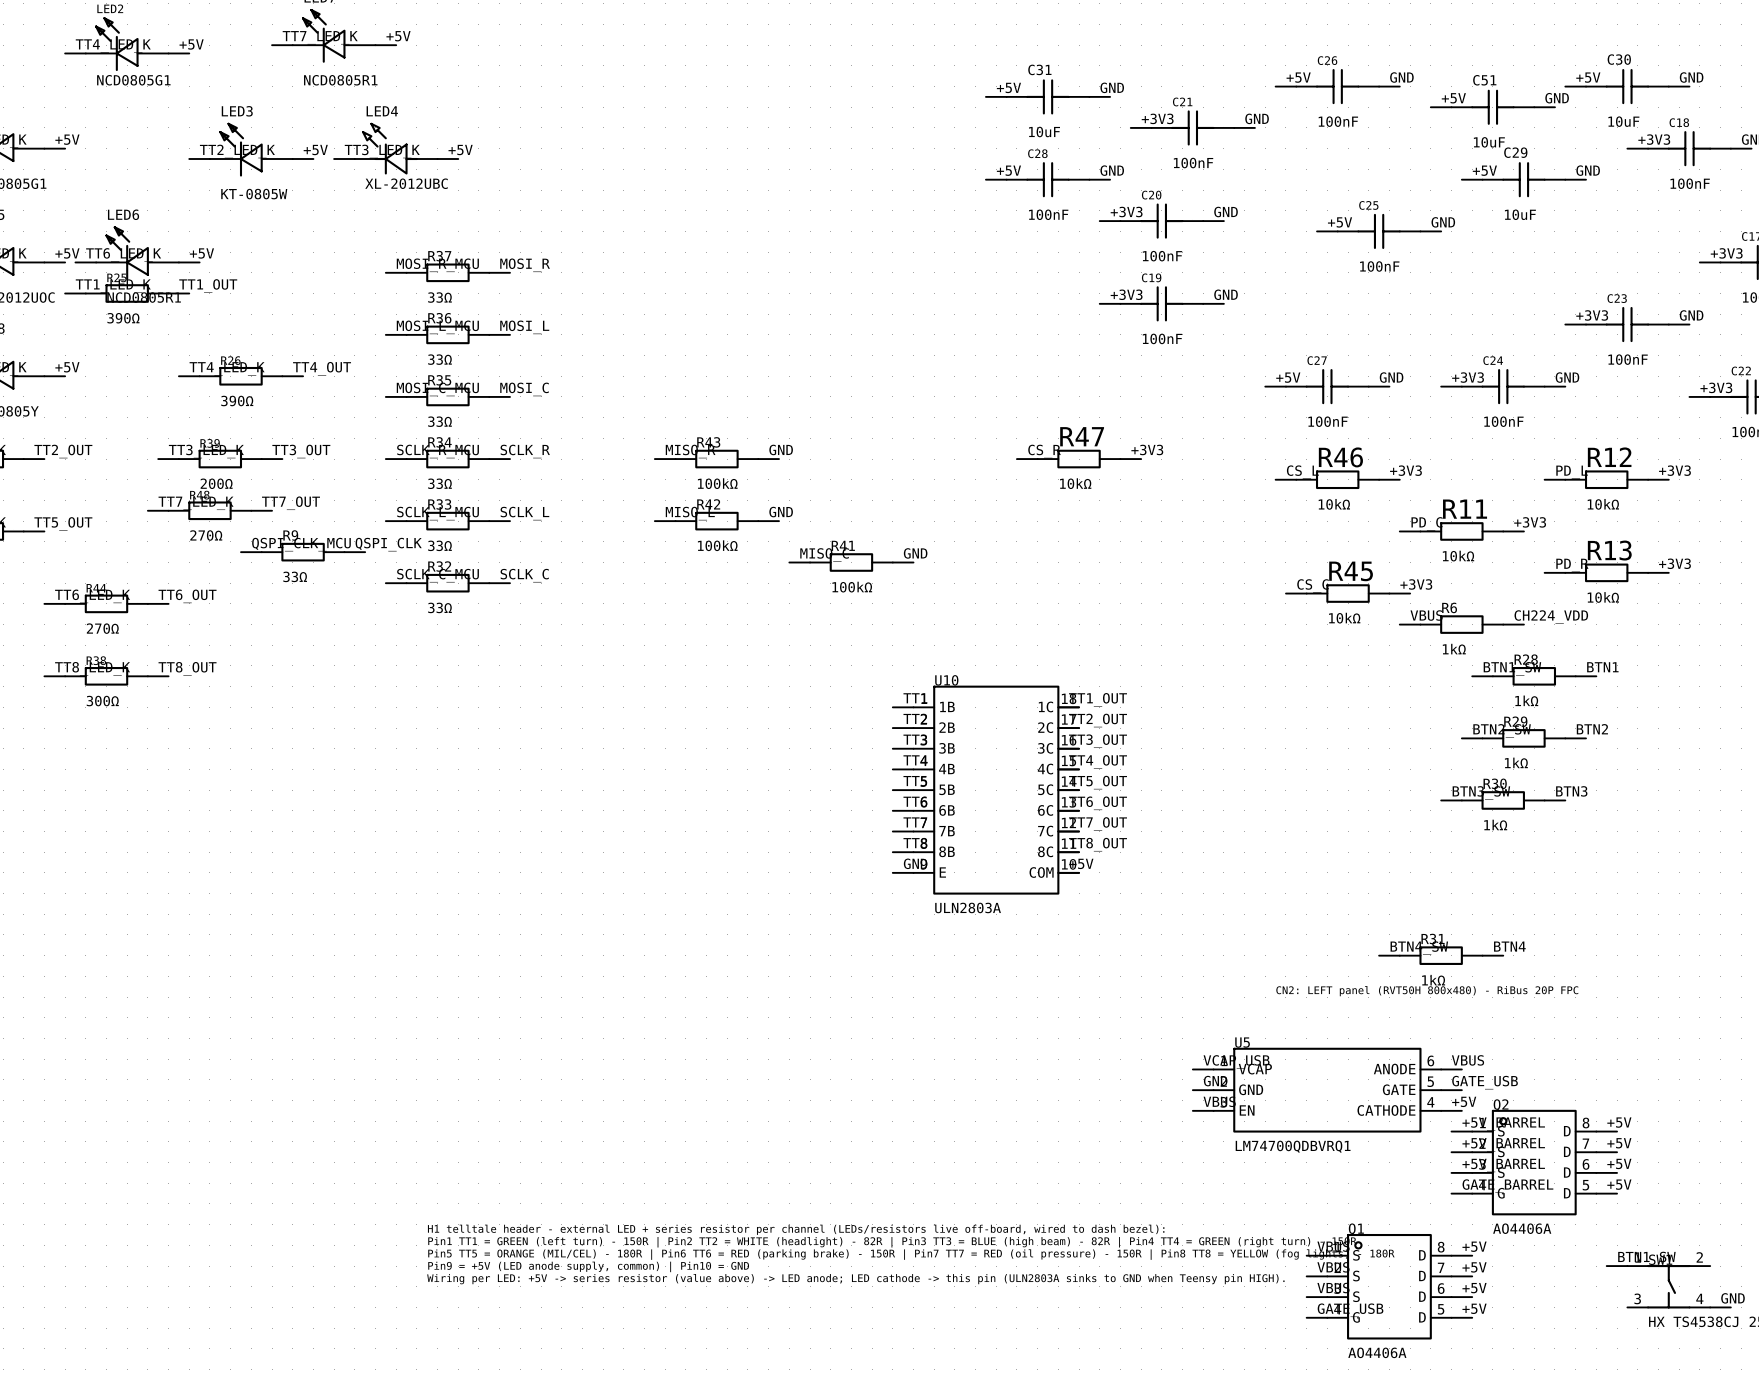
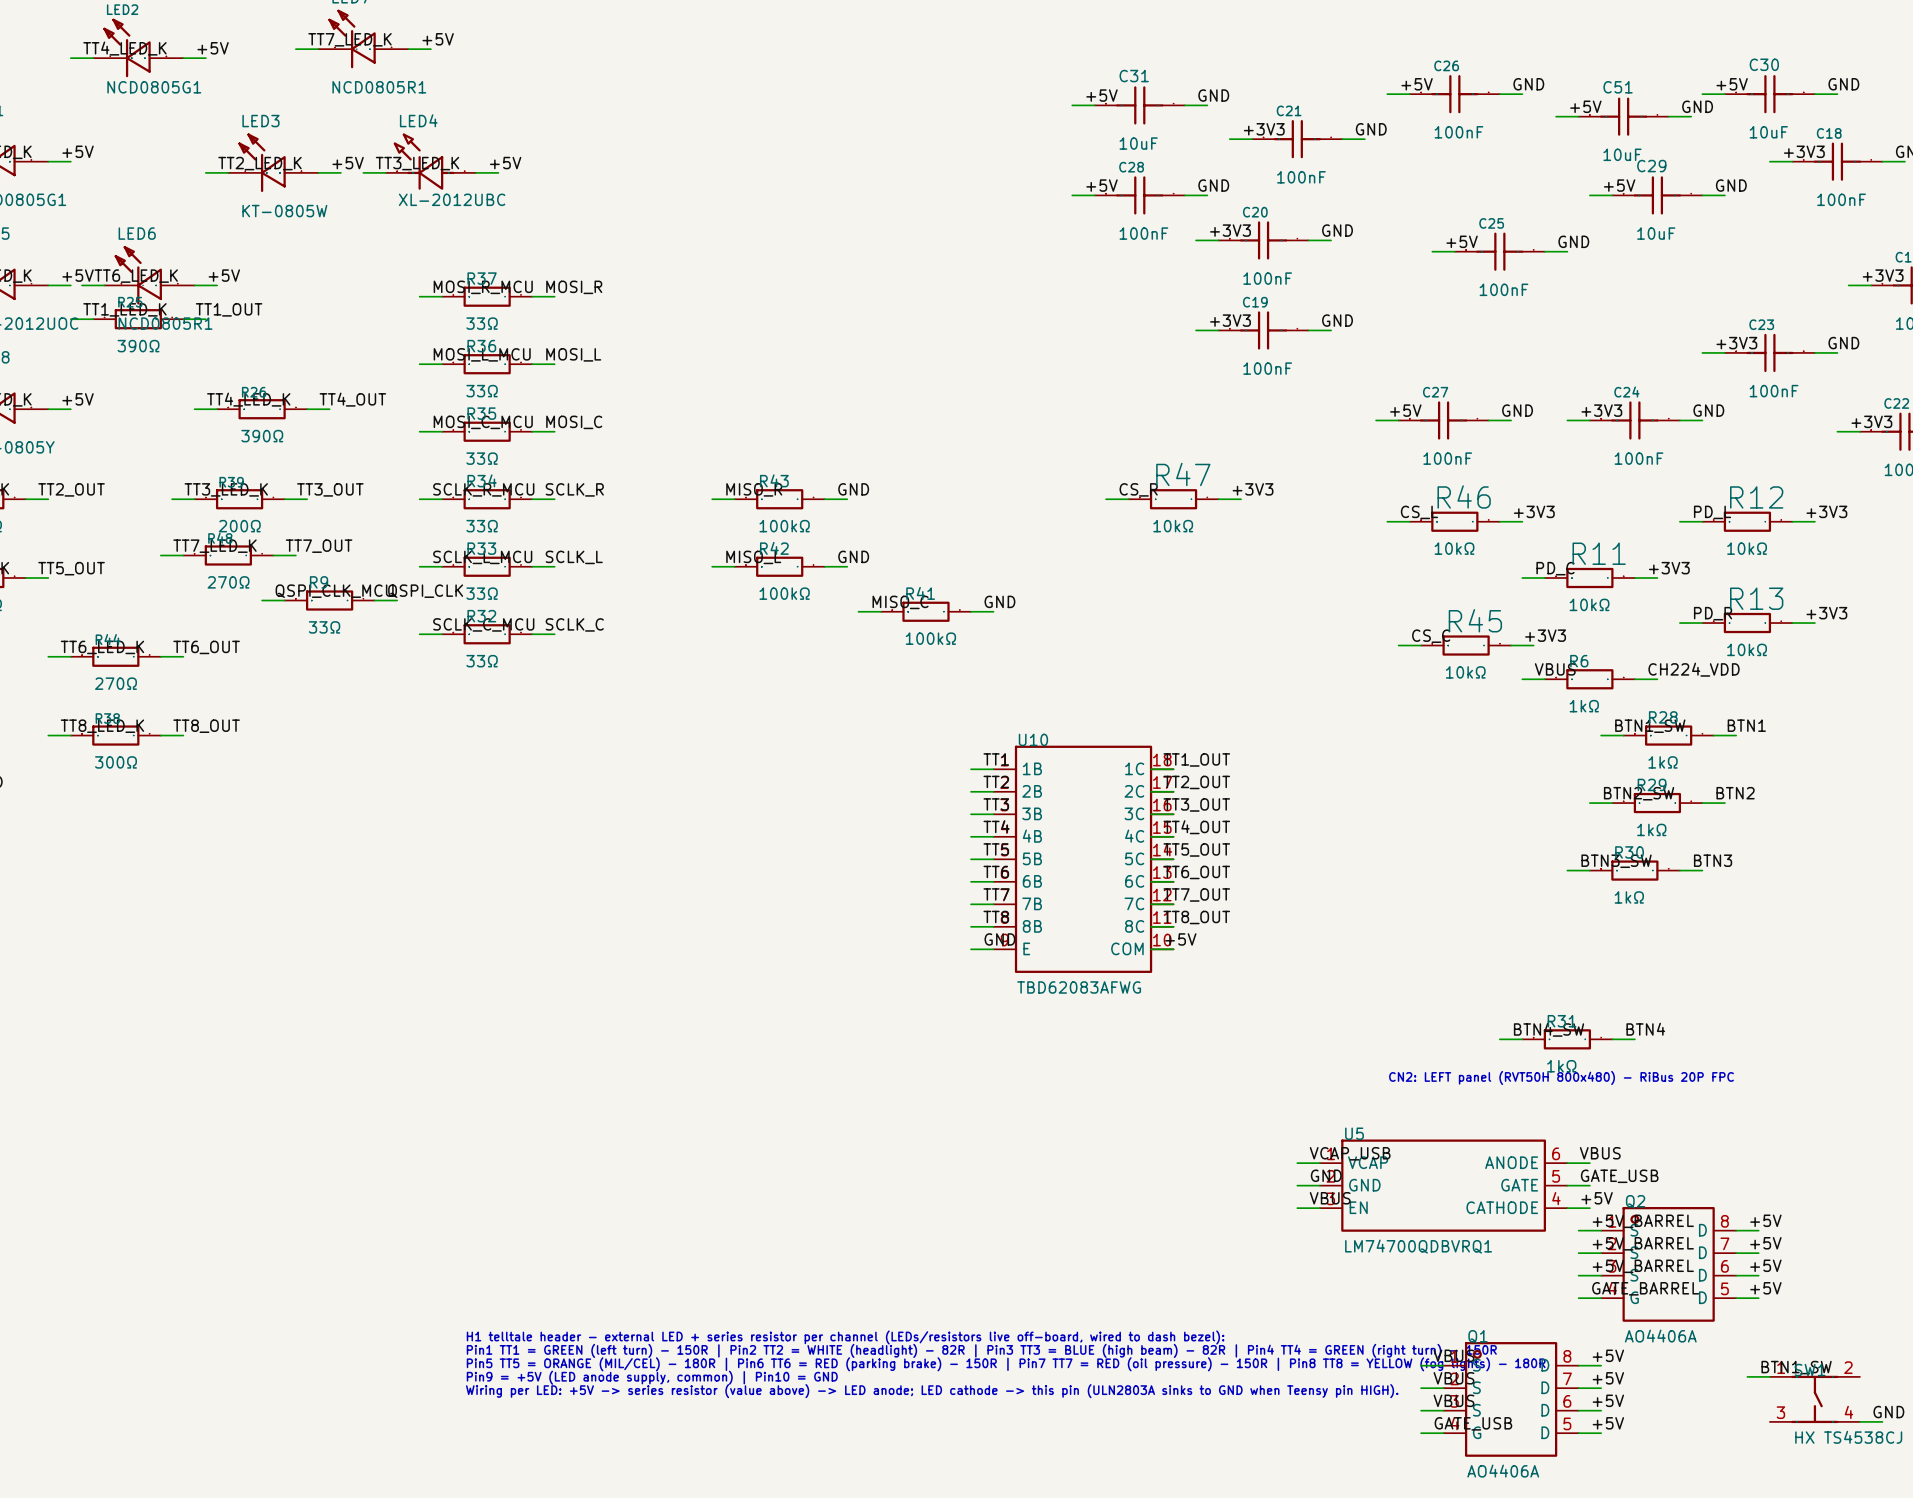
U10 value: ULN2803A (968, 907) -> TBD62083AFWG (1079, 987)

